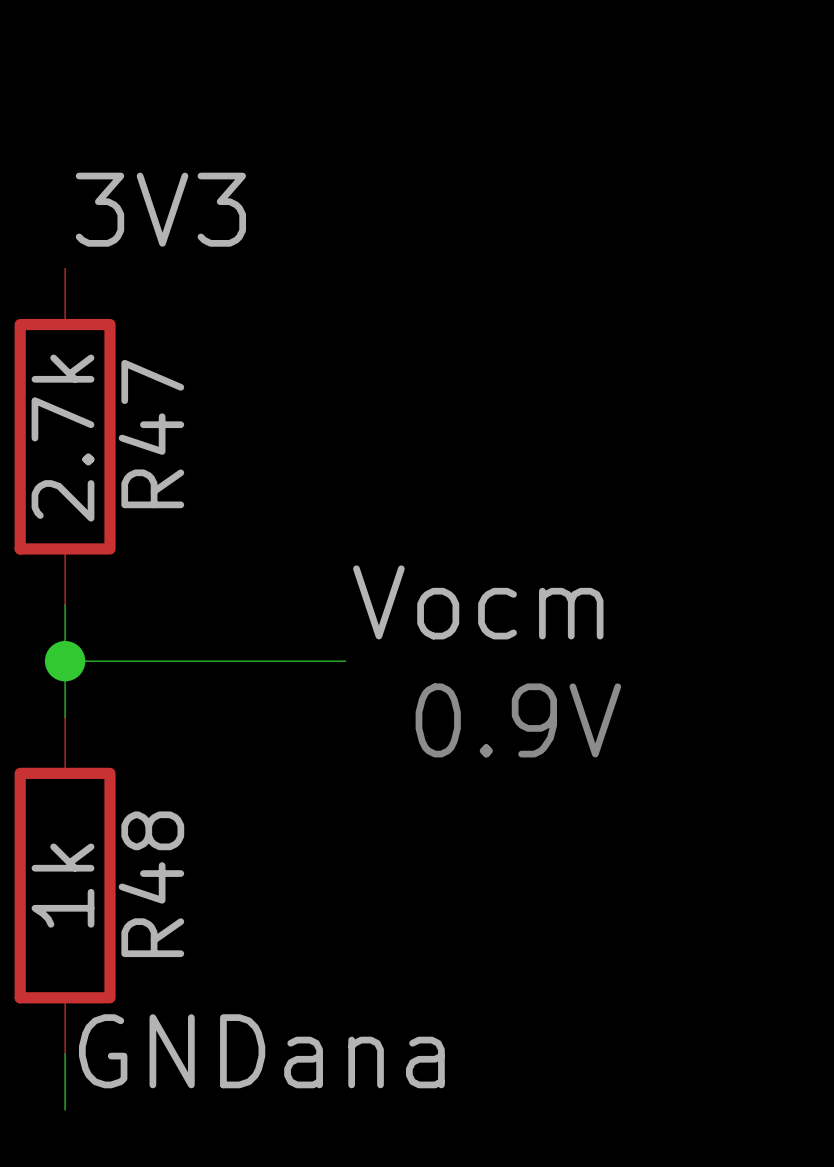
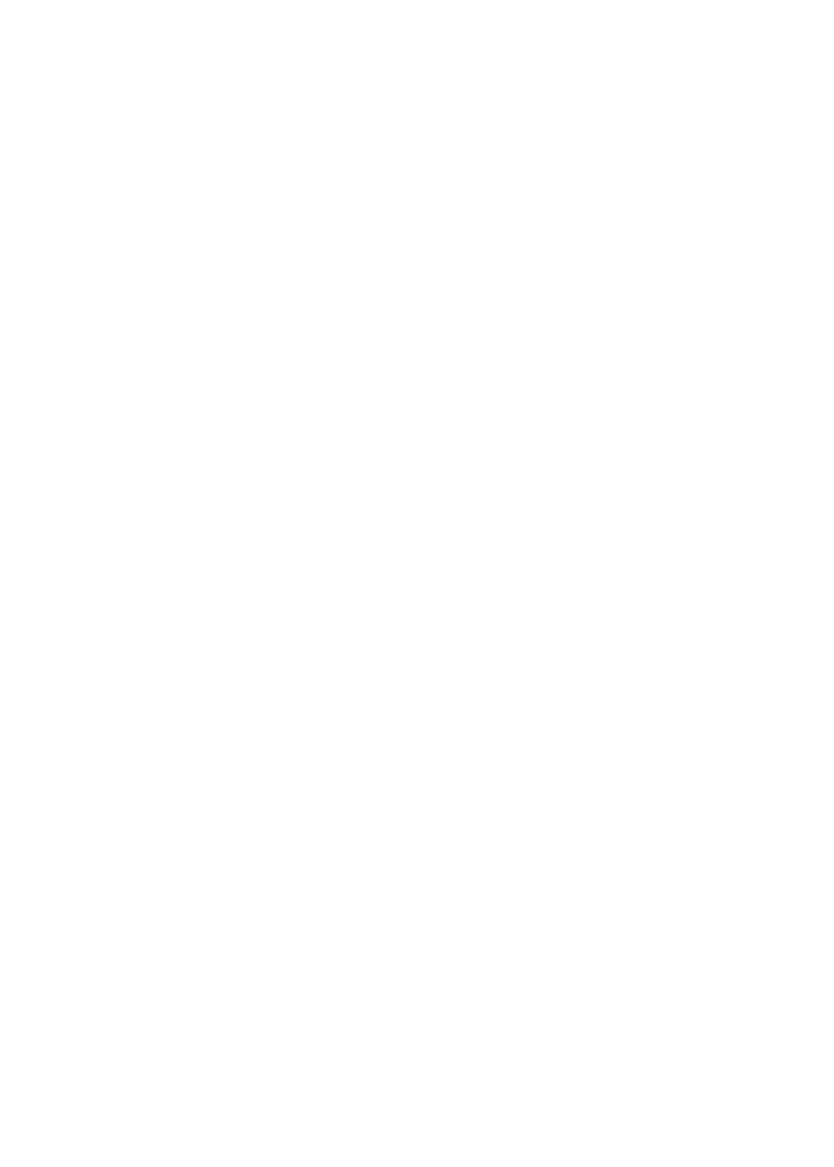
label: 3V3 (160, 209) -> none
R47: 2.7k (65, 436) -> none
label: Vocm (478, 602) -> none
wire: (65, 605) (65, 717) -> none
wire: (65, 661) (345, 661) -> none
junction: (65, 661) -> none
text: 0.9V (518, 720) -> none
R48: 1k (65, 885) -> none
label: GNDana (261, 1051) -> none
wire: (65, 1053) (65, 1110) -> none

